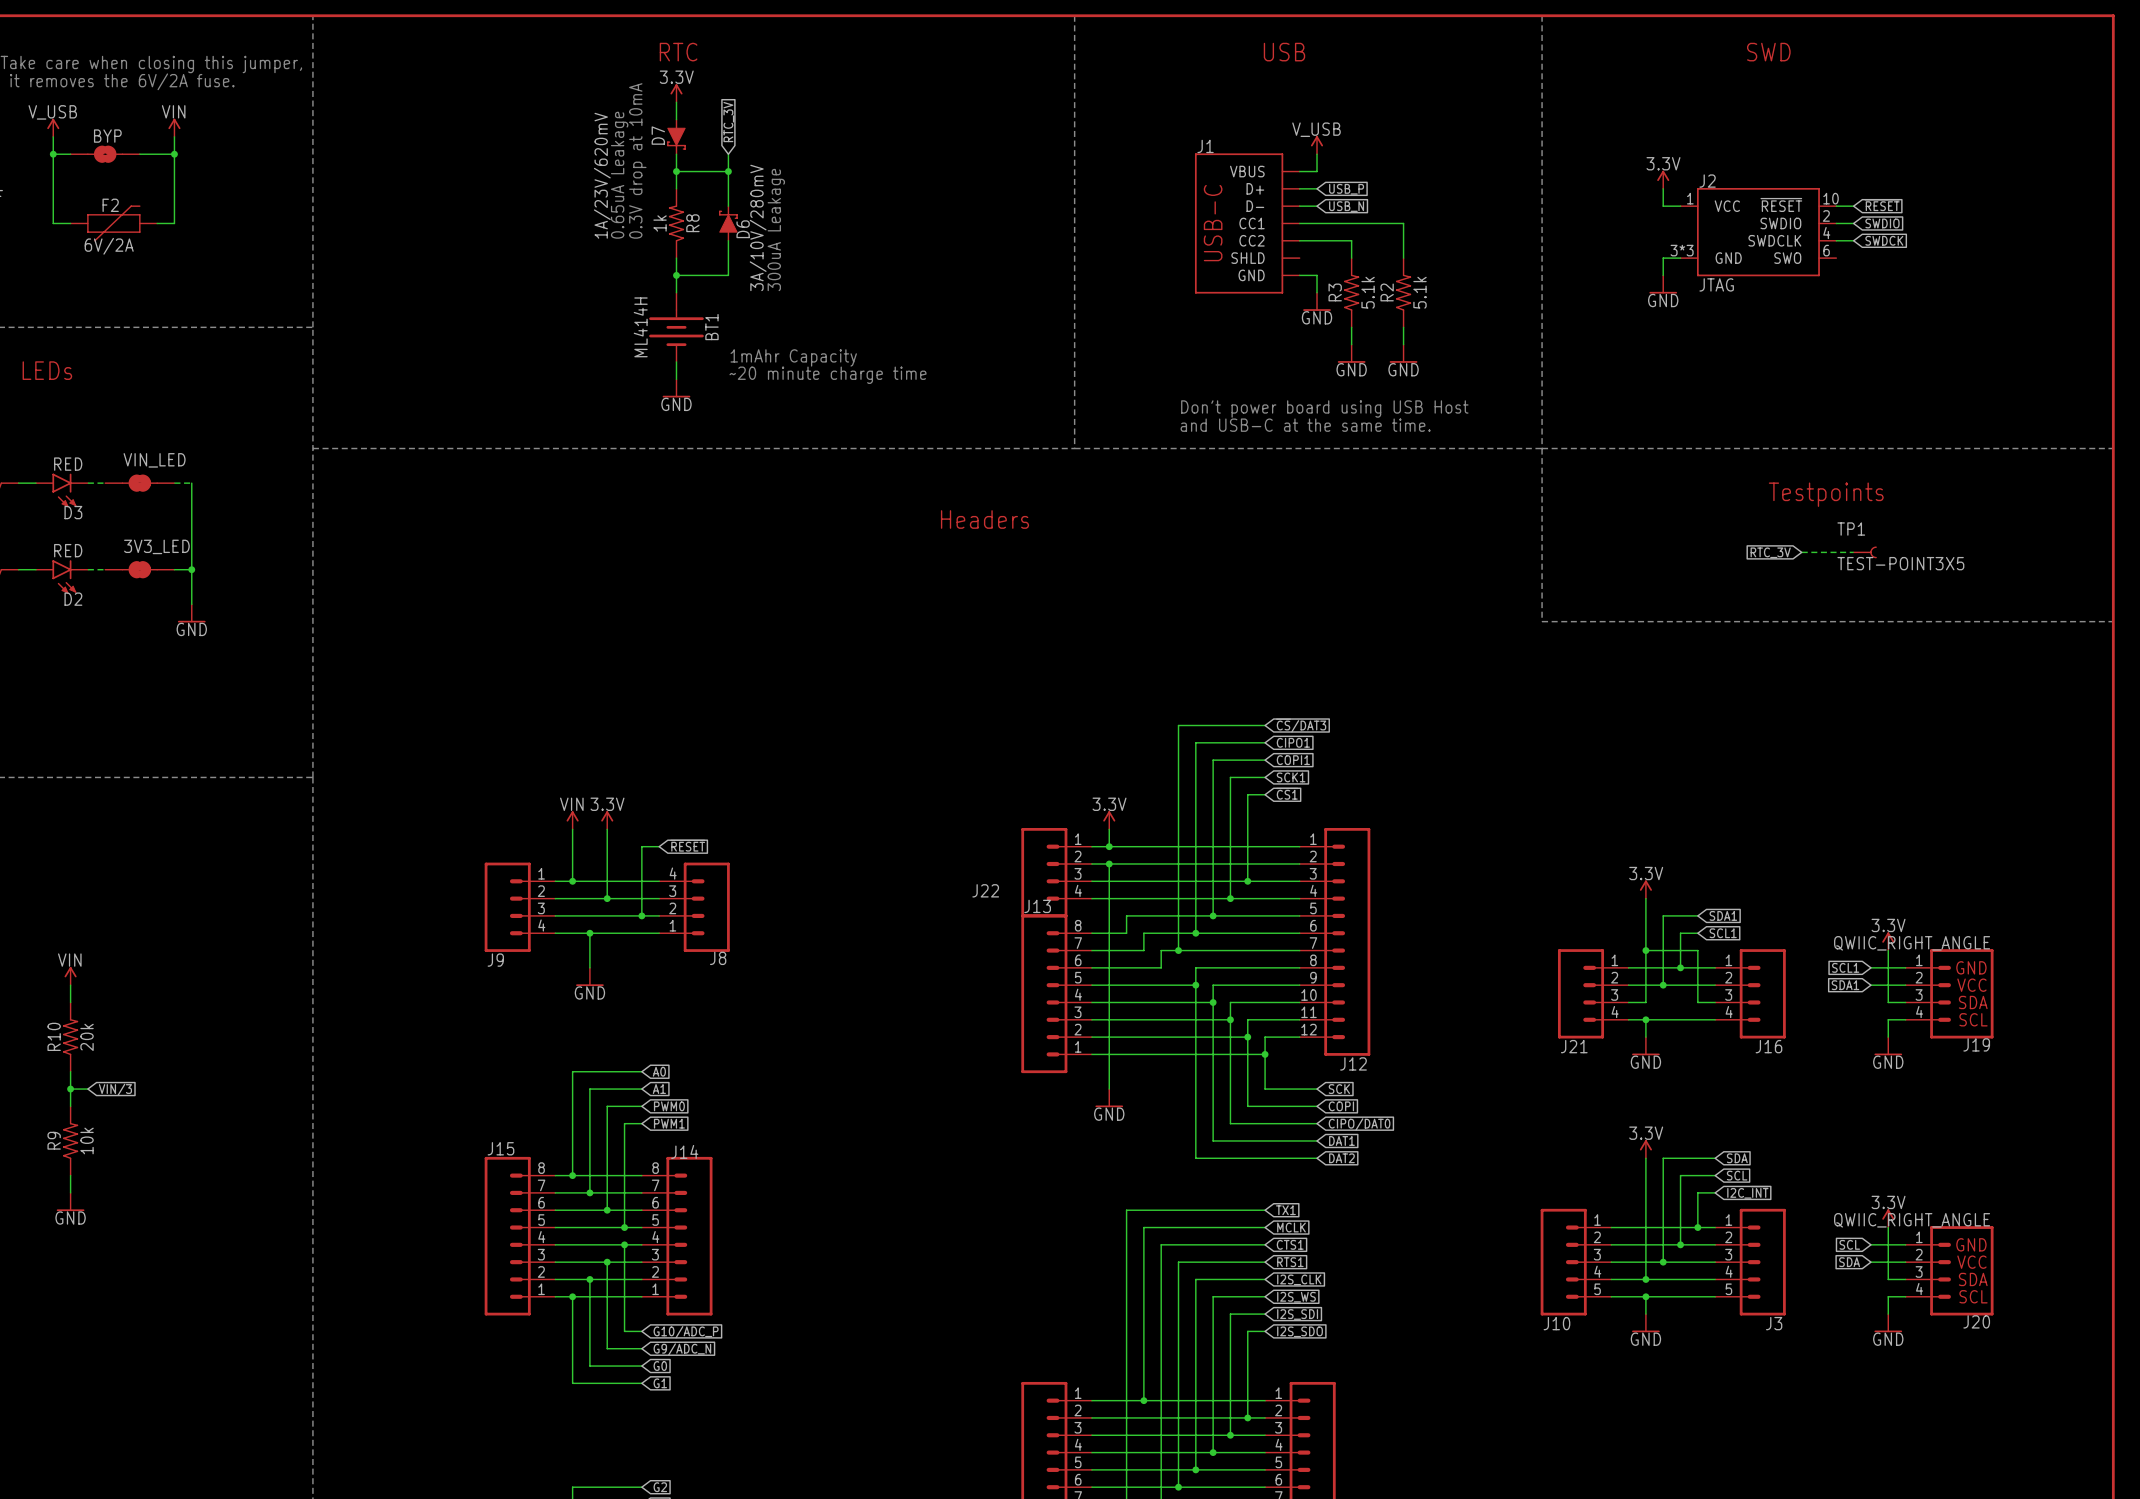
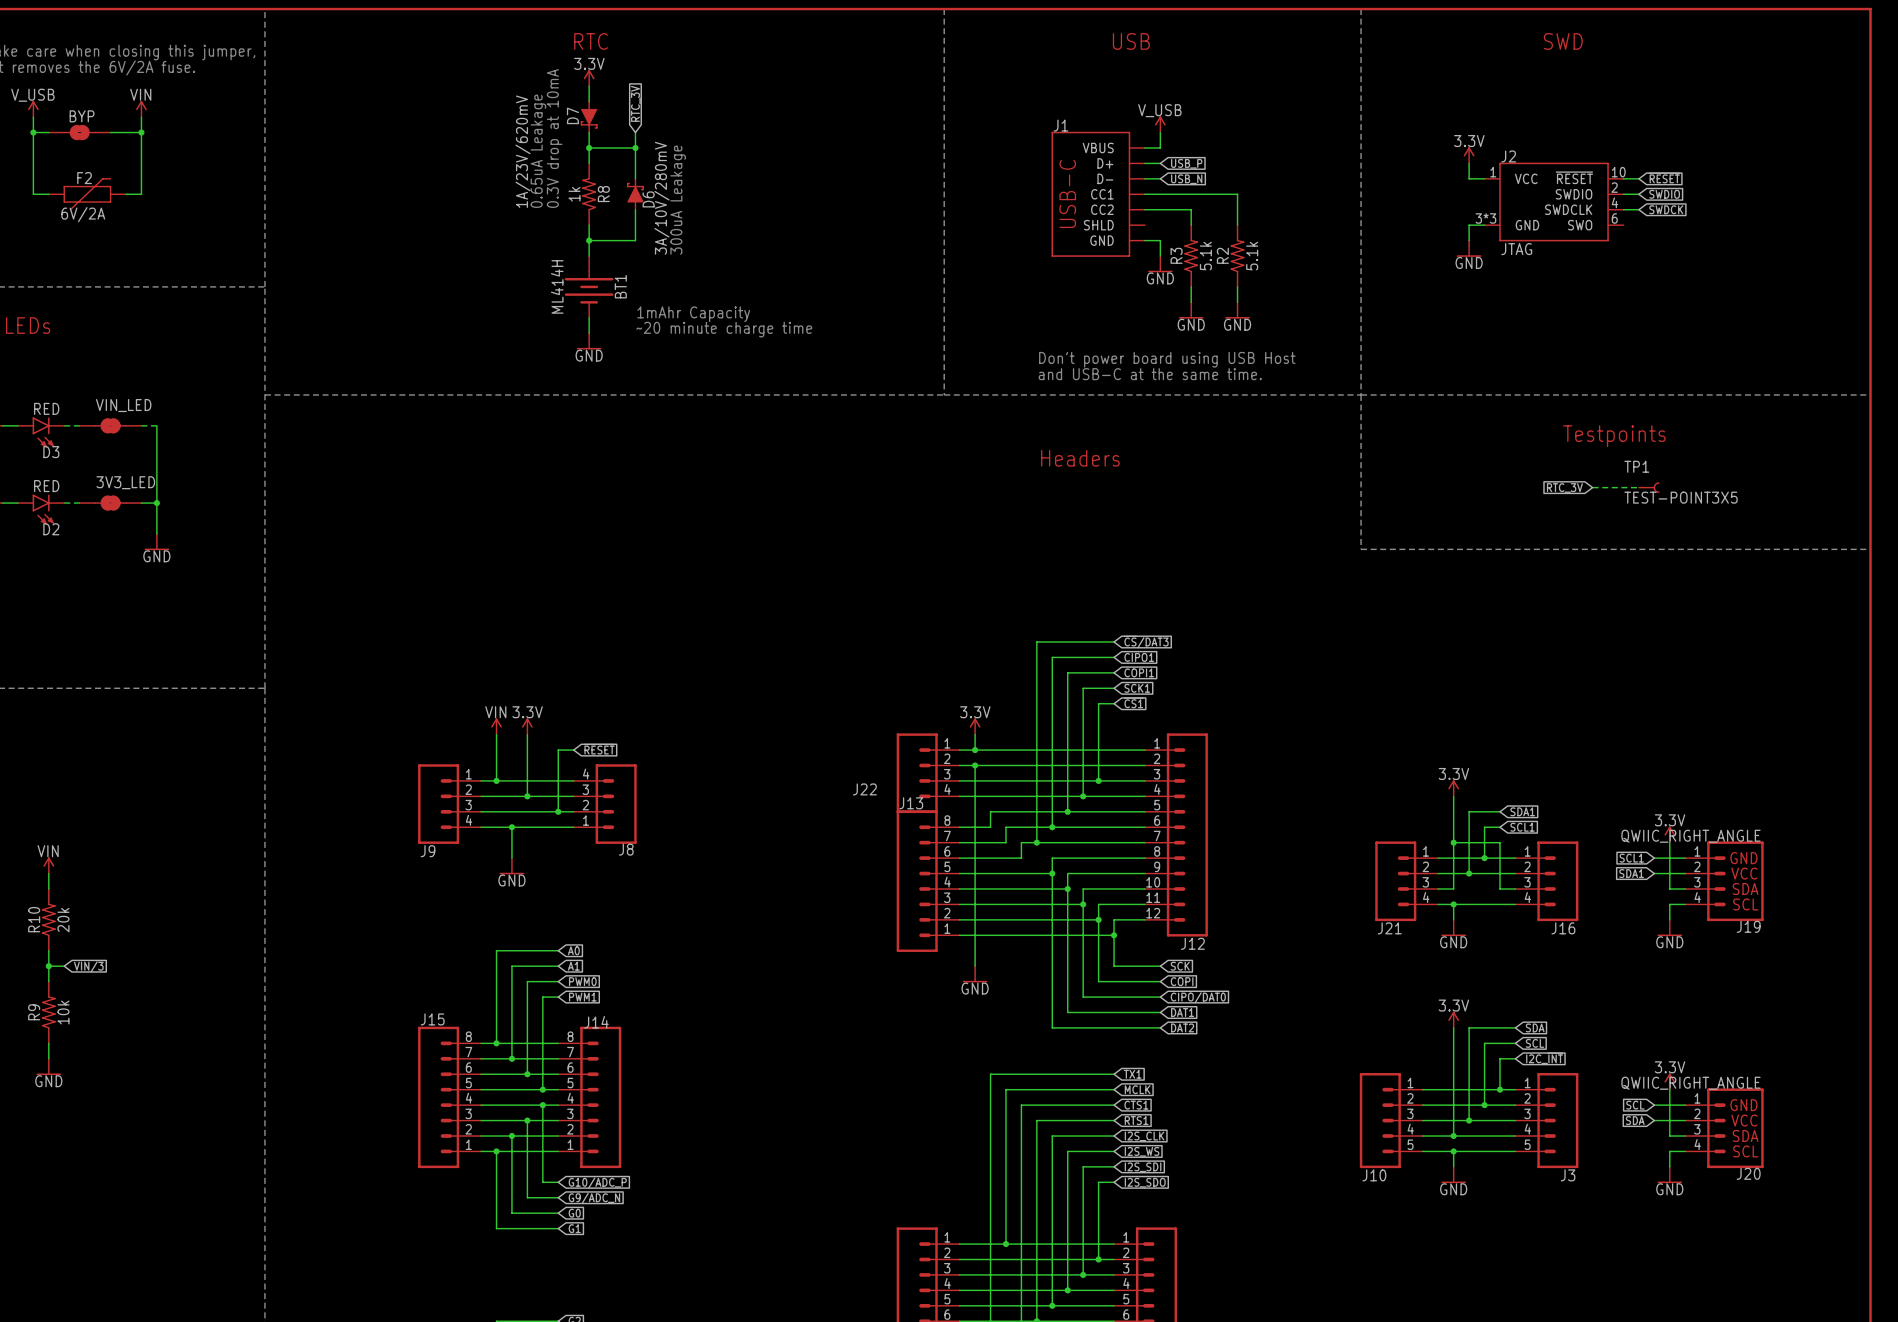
text: Headers (984, 519) -> none
text: none -> Headers (1080, 458)

